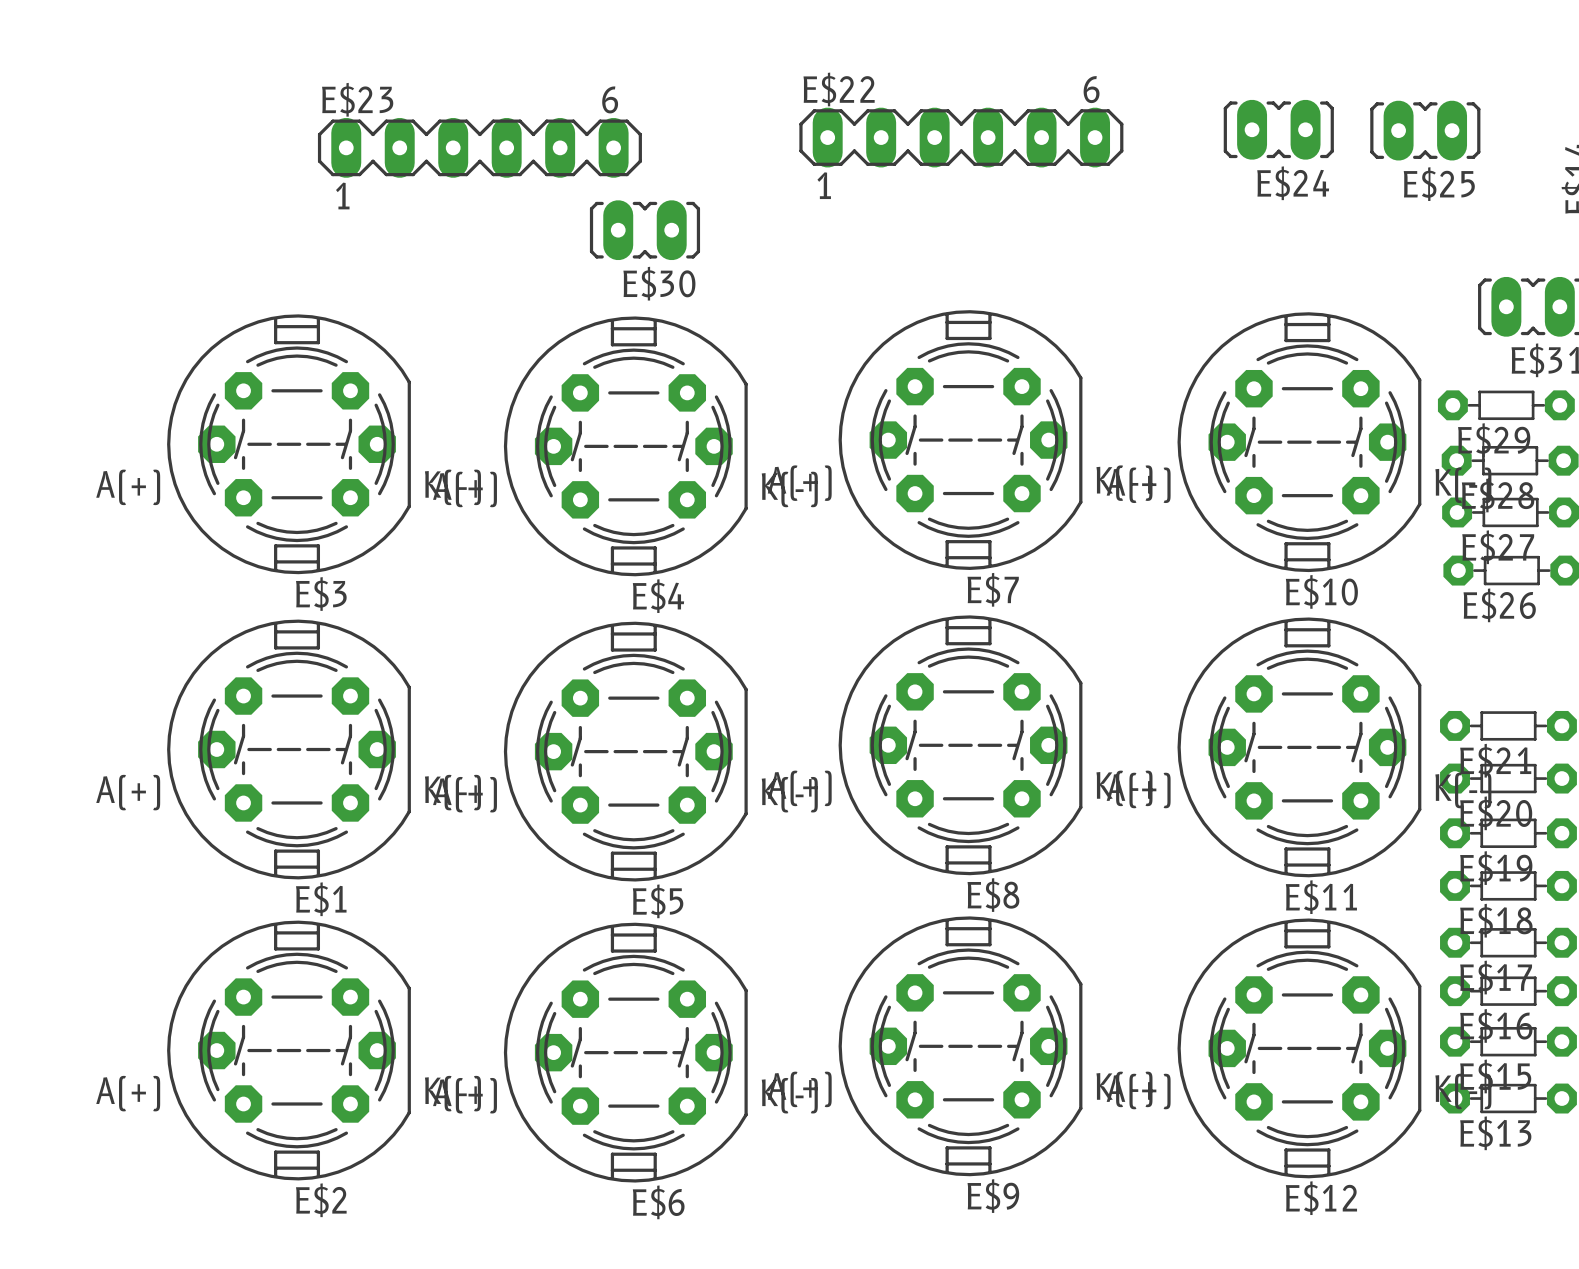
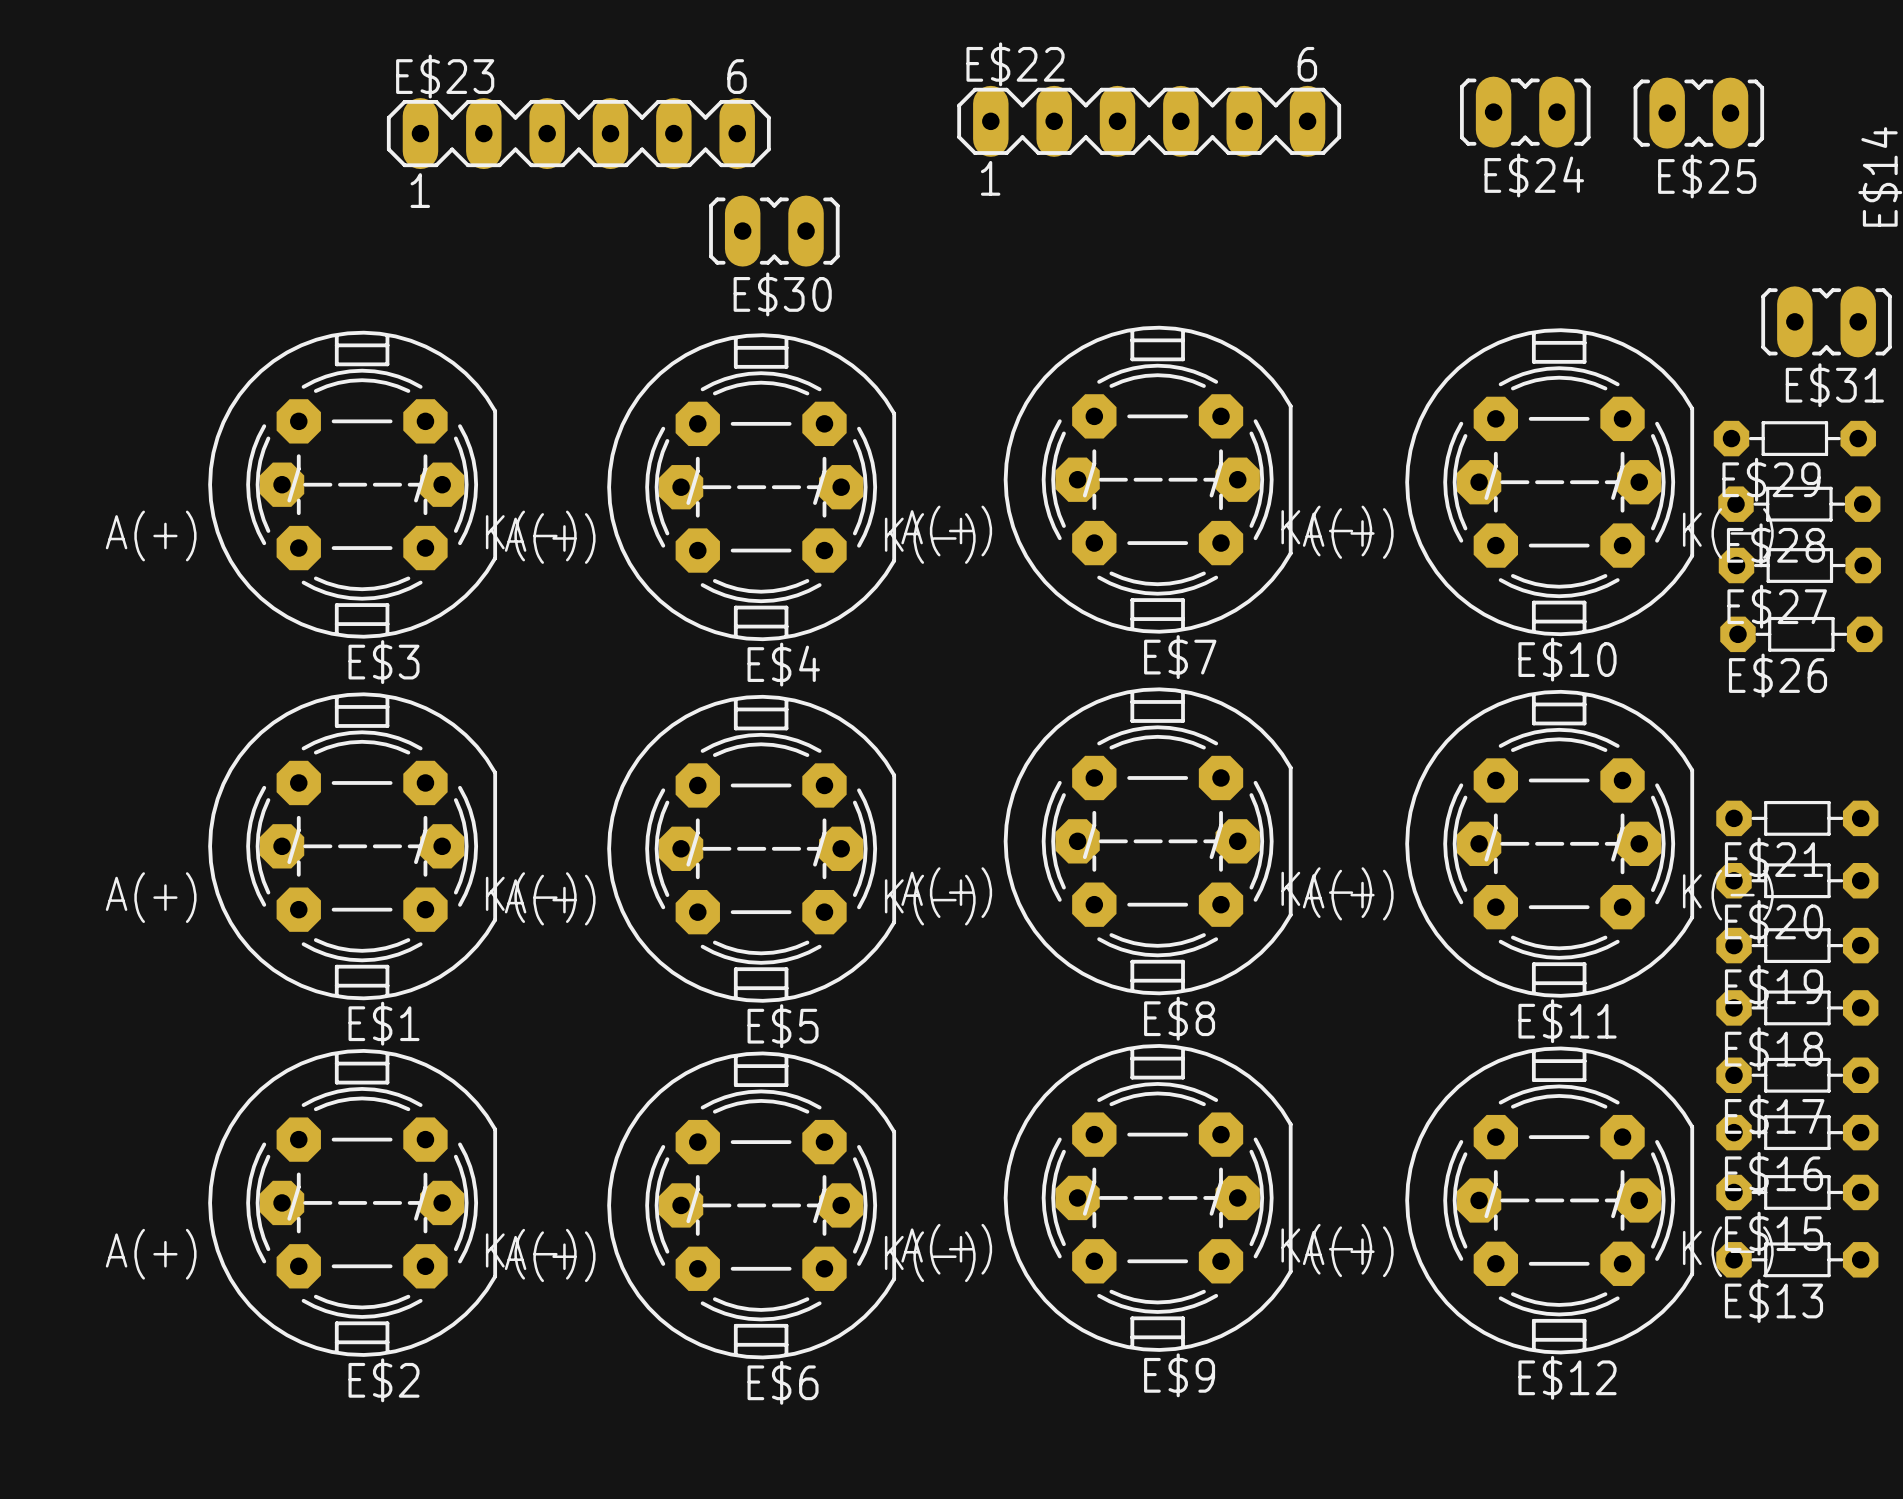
E$7 footprint: [838, 310, 1083, 570] -> [1003, 325, 1293, 634]
E$10 footprint: [1177, 312, 1422, 573] -> [1405, 328, 1695, 637]
E$3 footprint: [167, 314, 411, 575] -> [208, 330, 498, 639]
E$4 footprint: [503, 316, 748, 577] -> [607, 333, 897, 642]
E$8 footprint: [838, 615, 1083, 876] -> [1003, 687, 1293, 996]
E$11 footprint: [1177, 617, 1422, 878] -> [1405, 689, 1695, 998]
E$1 footprint: [167, 619, 411, 880] -> [208, 692, 498, 1001]
E$5 footprint: [503, 621, 748, 882] -> [607, 694, 897, 1003]
E$9 footprint: [838, 916, 1083, 1177] -> [1003, 1044, 1293, 1352]
E$12 footprint: [1177, 918, 1422, 1179] -> [1405, 1046, 1695, 1355]
E$2 footprint: [167, 920, 411, 1181] -> [208, 1049, 498, 1357]
E$6 footprint: [503, 922, 748, 1183] -> [607, 1051, 897, 1360]

